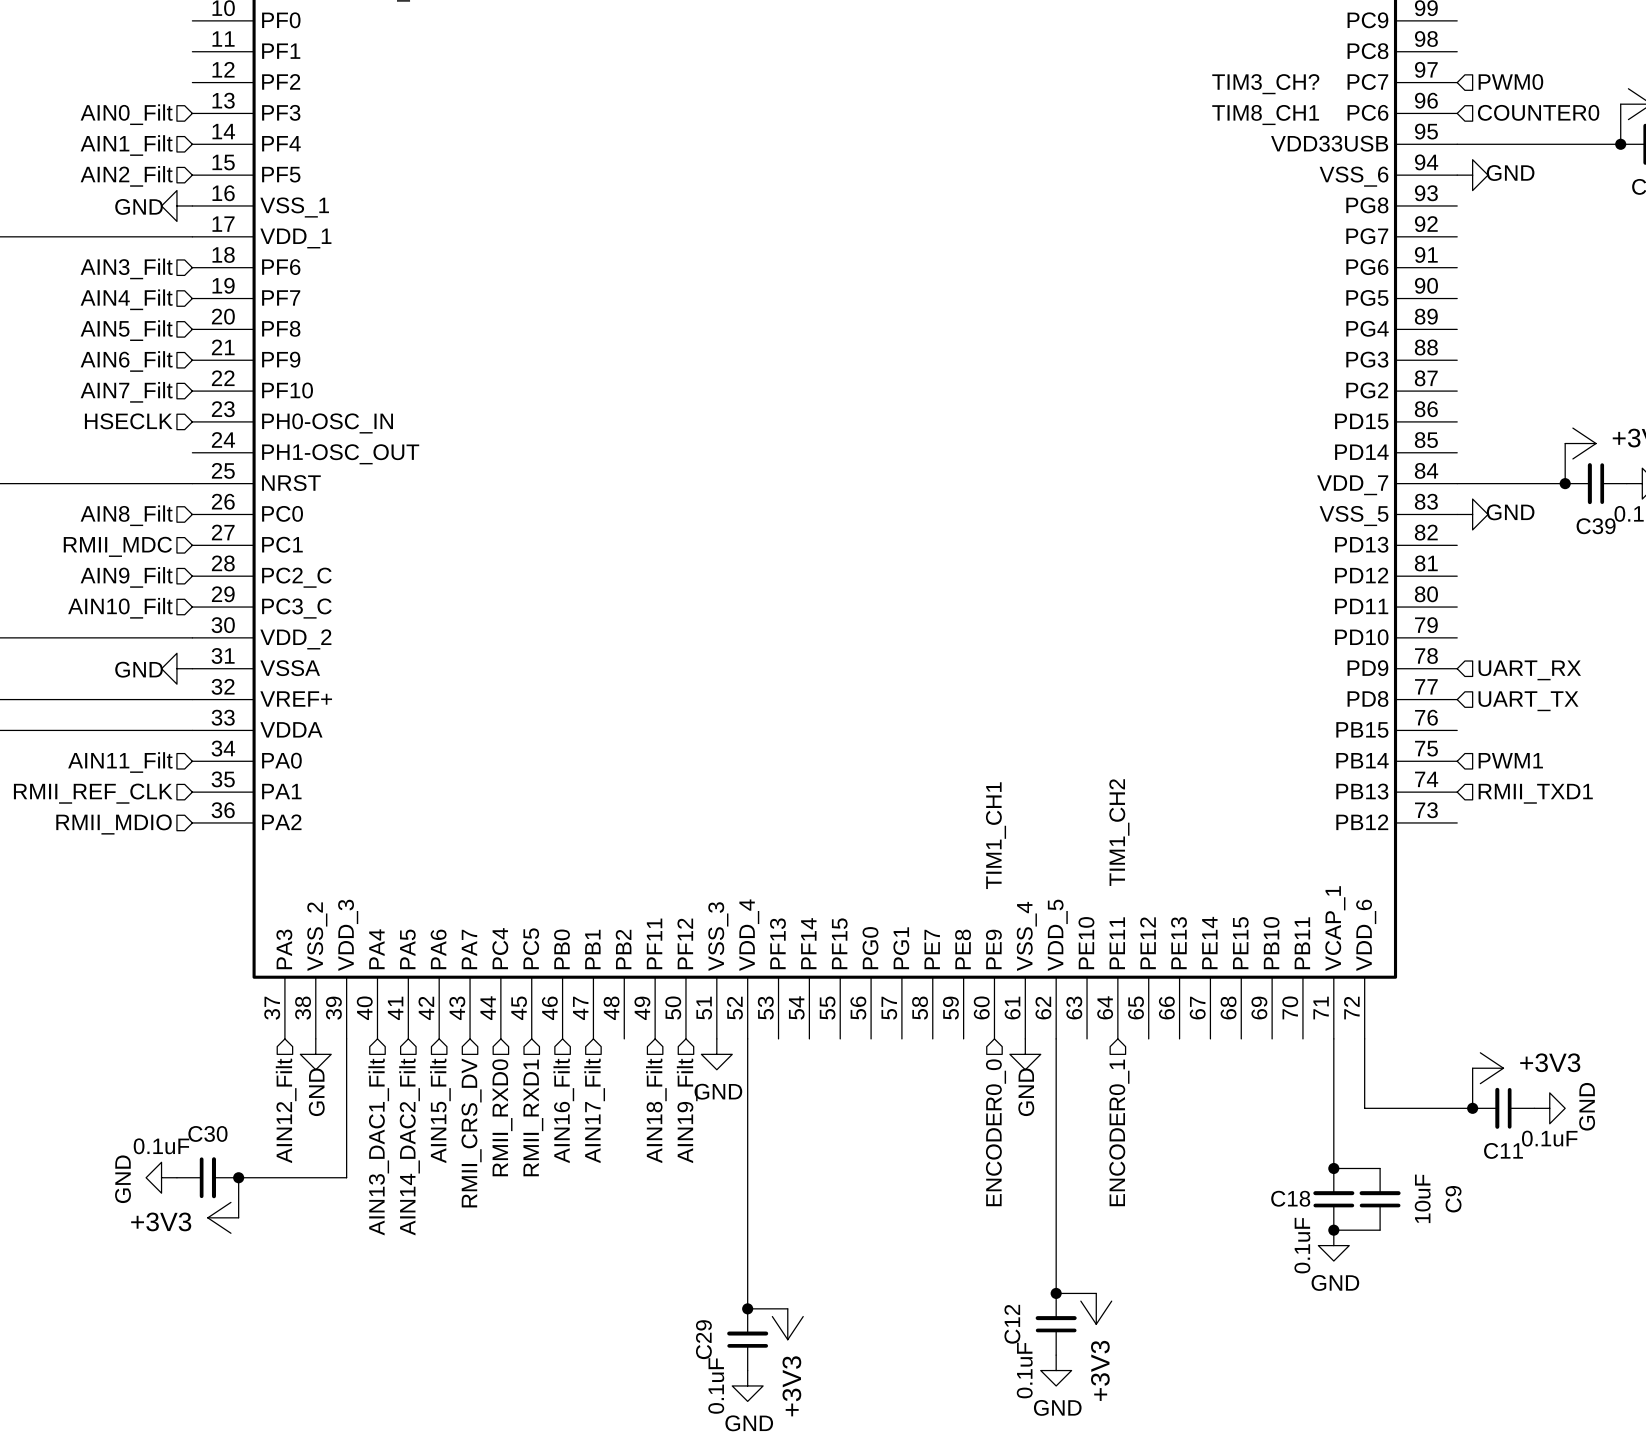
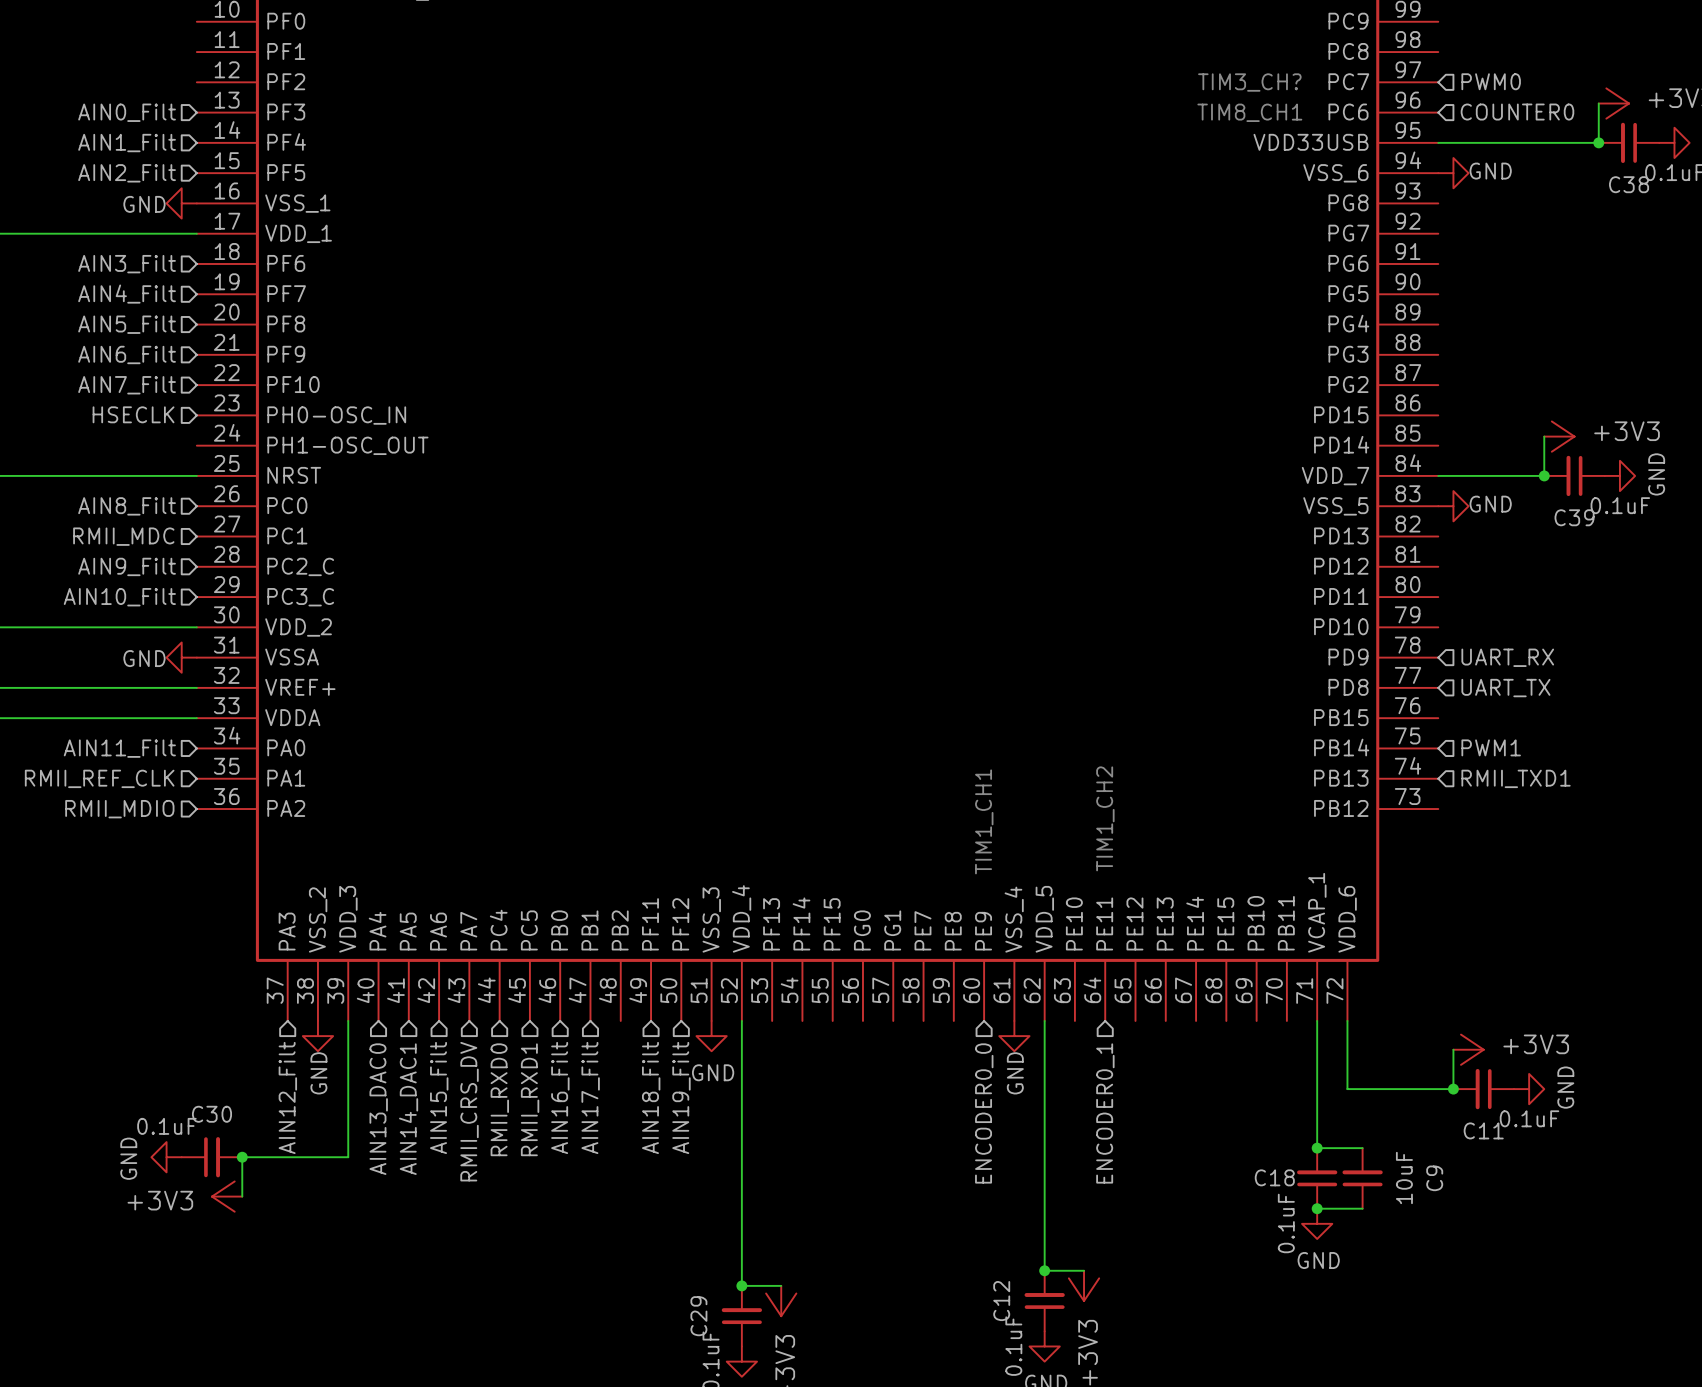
hierarchical label: AIN13_DAC1_Filt (378, 1147) -> AIN13_DAC0 (378, 1109)
hierarchical label: AIN14_DAC2_Filt (409, 1147) -> AIN14_DAC1 (408, 1109)

